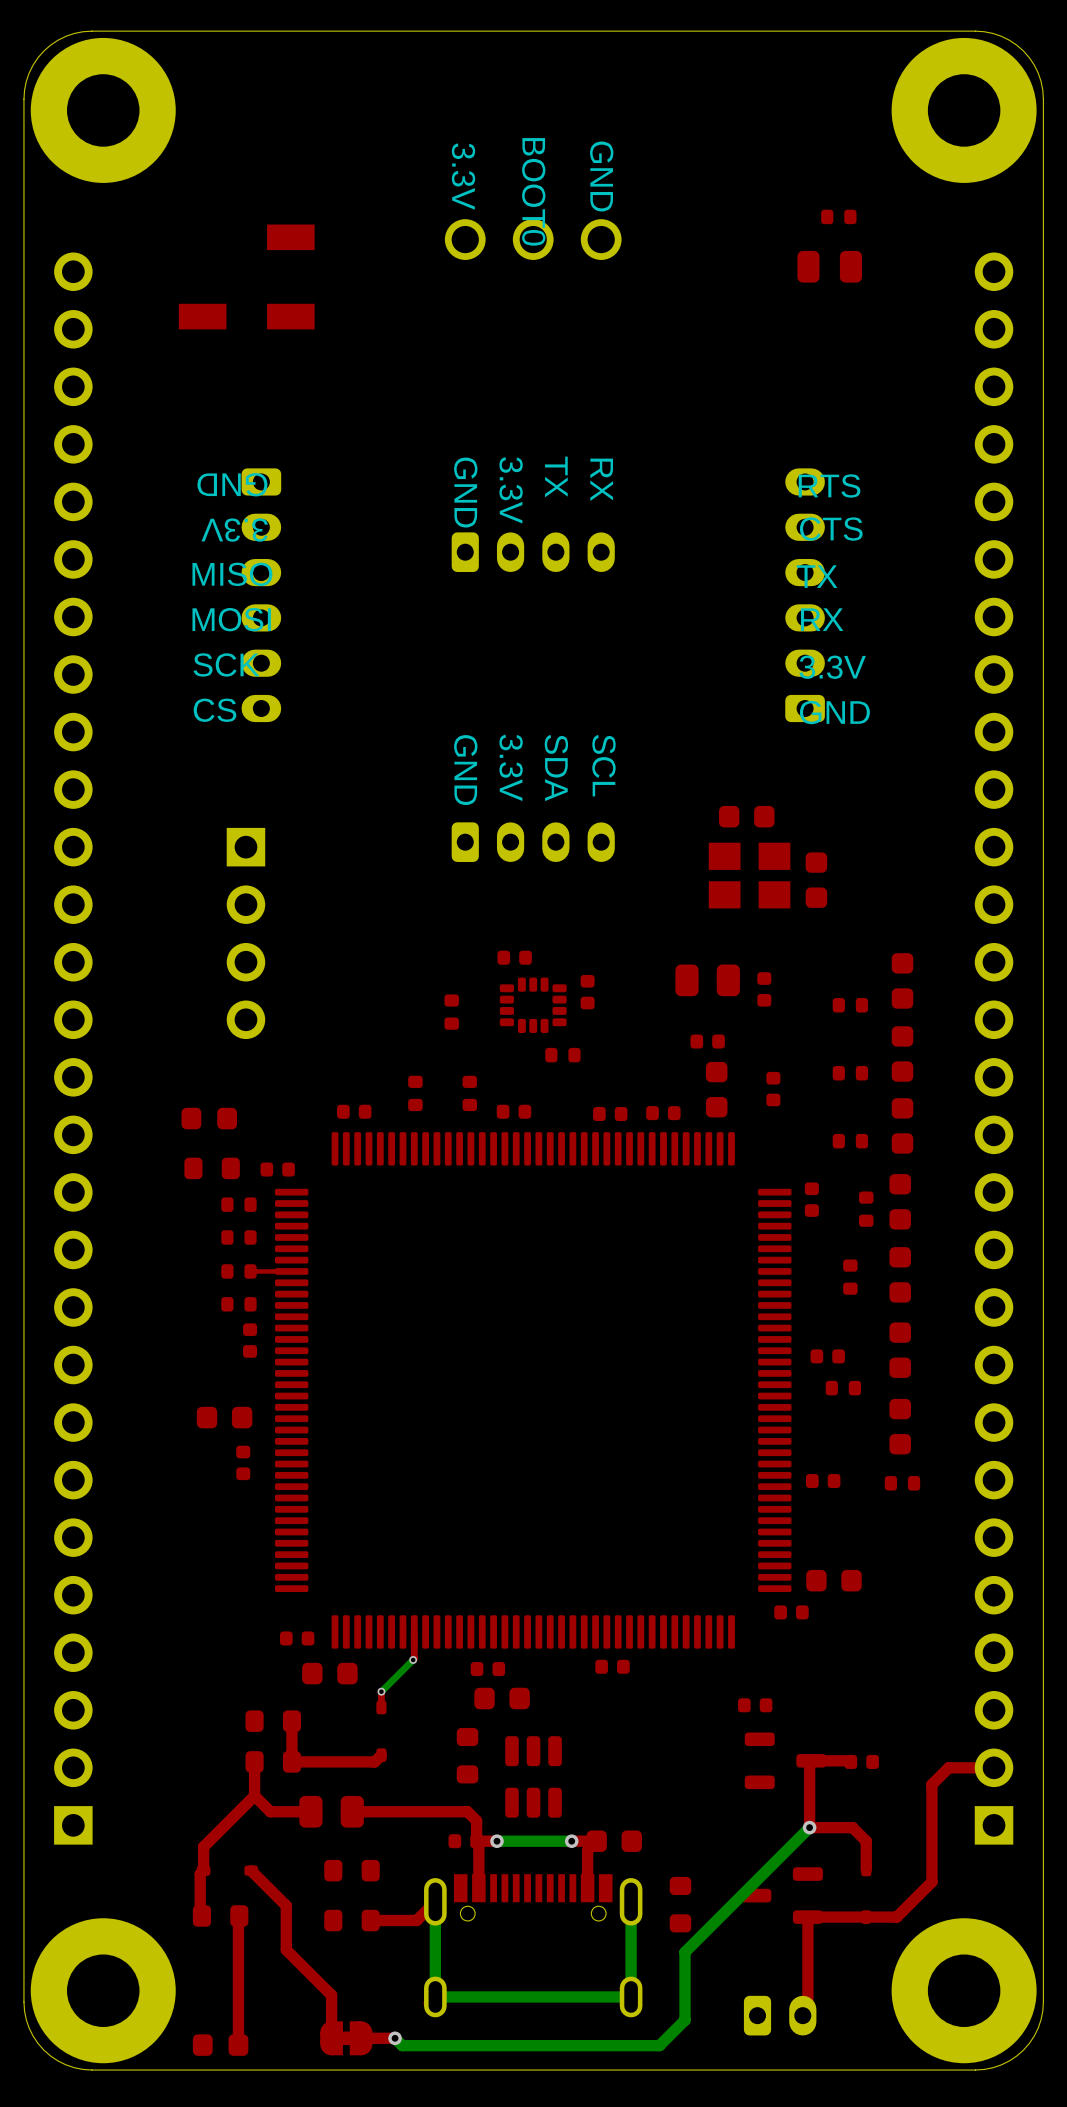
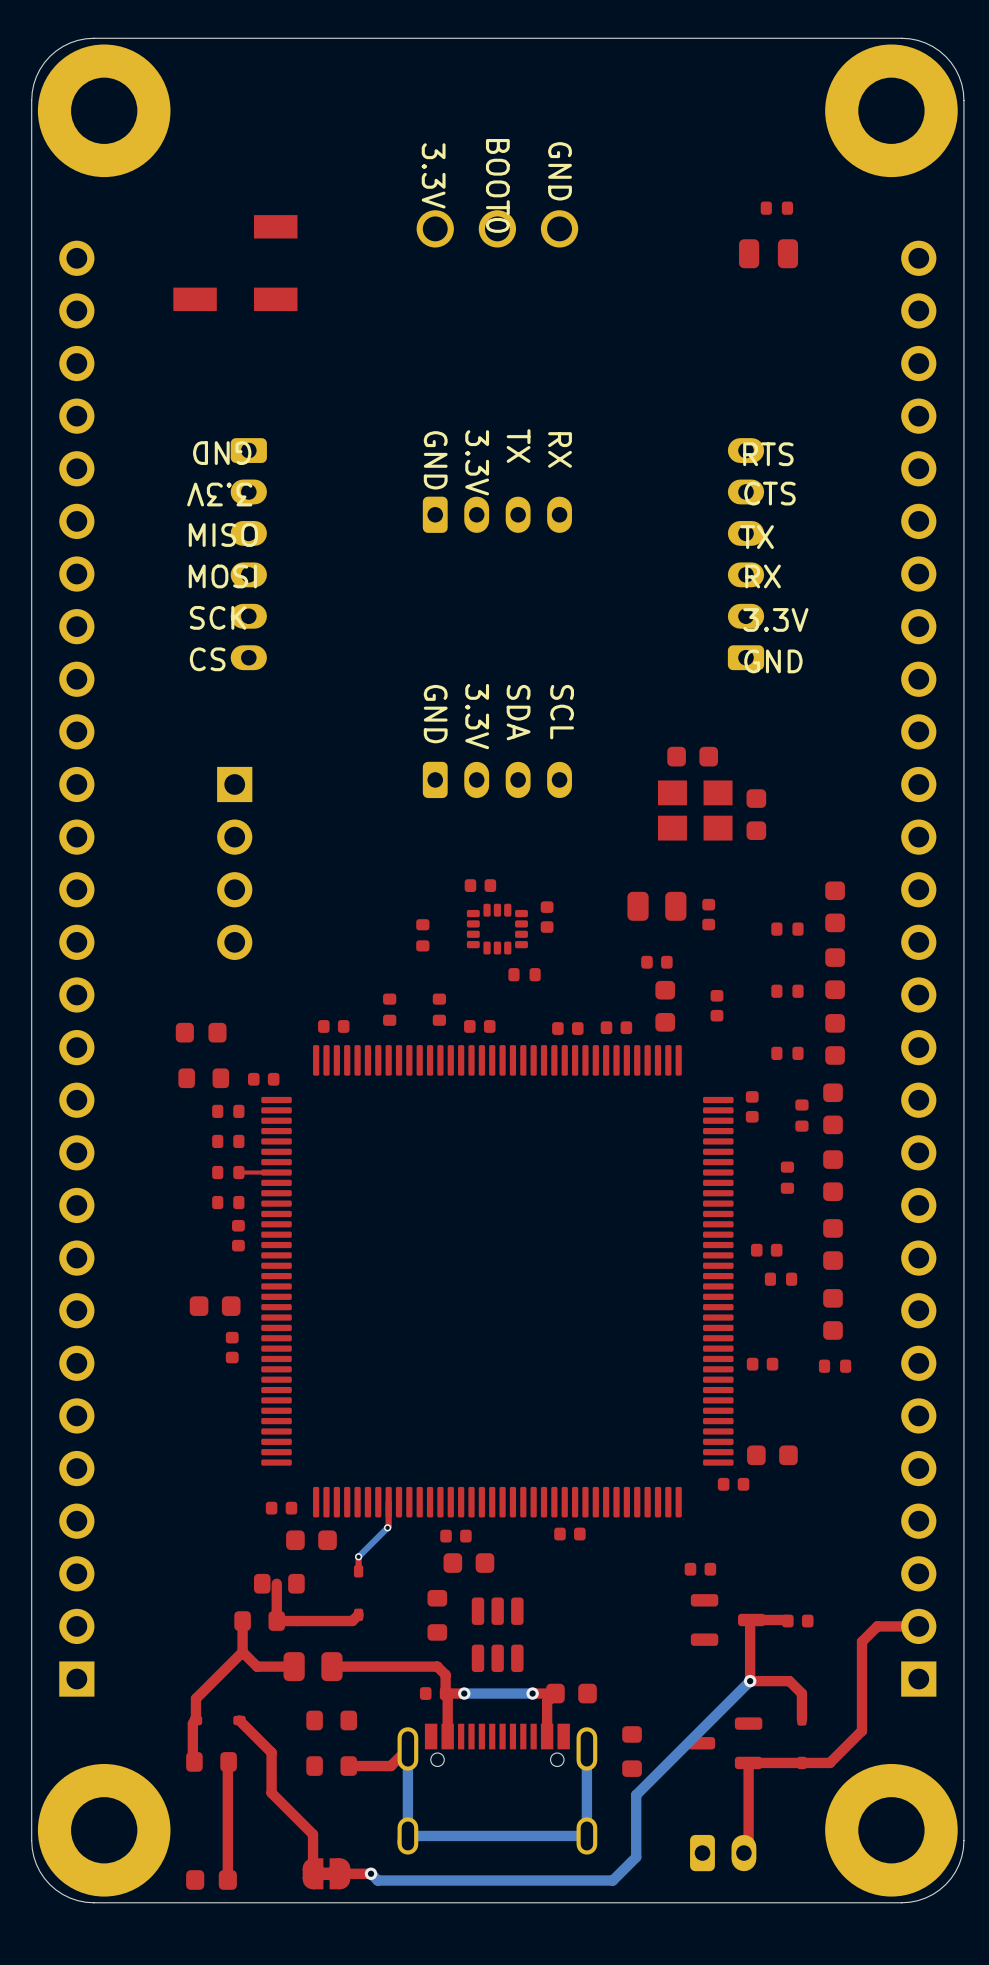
part position: (273, 1721) -> (279, 1583)

